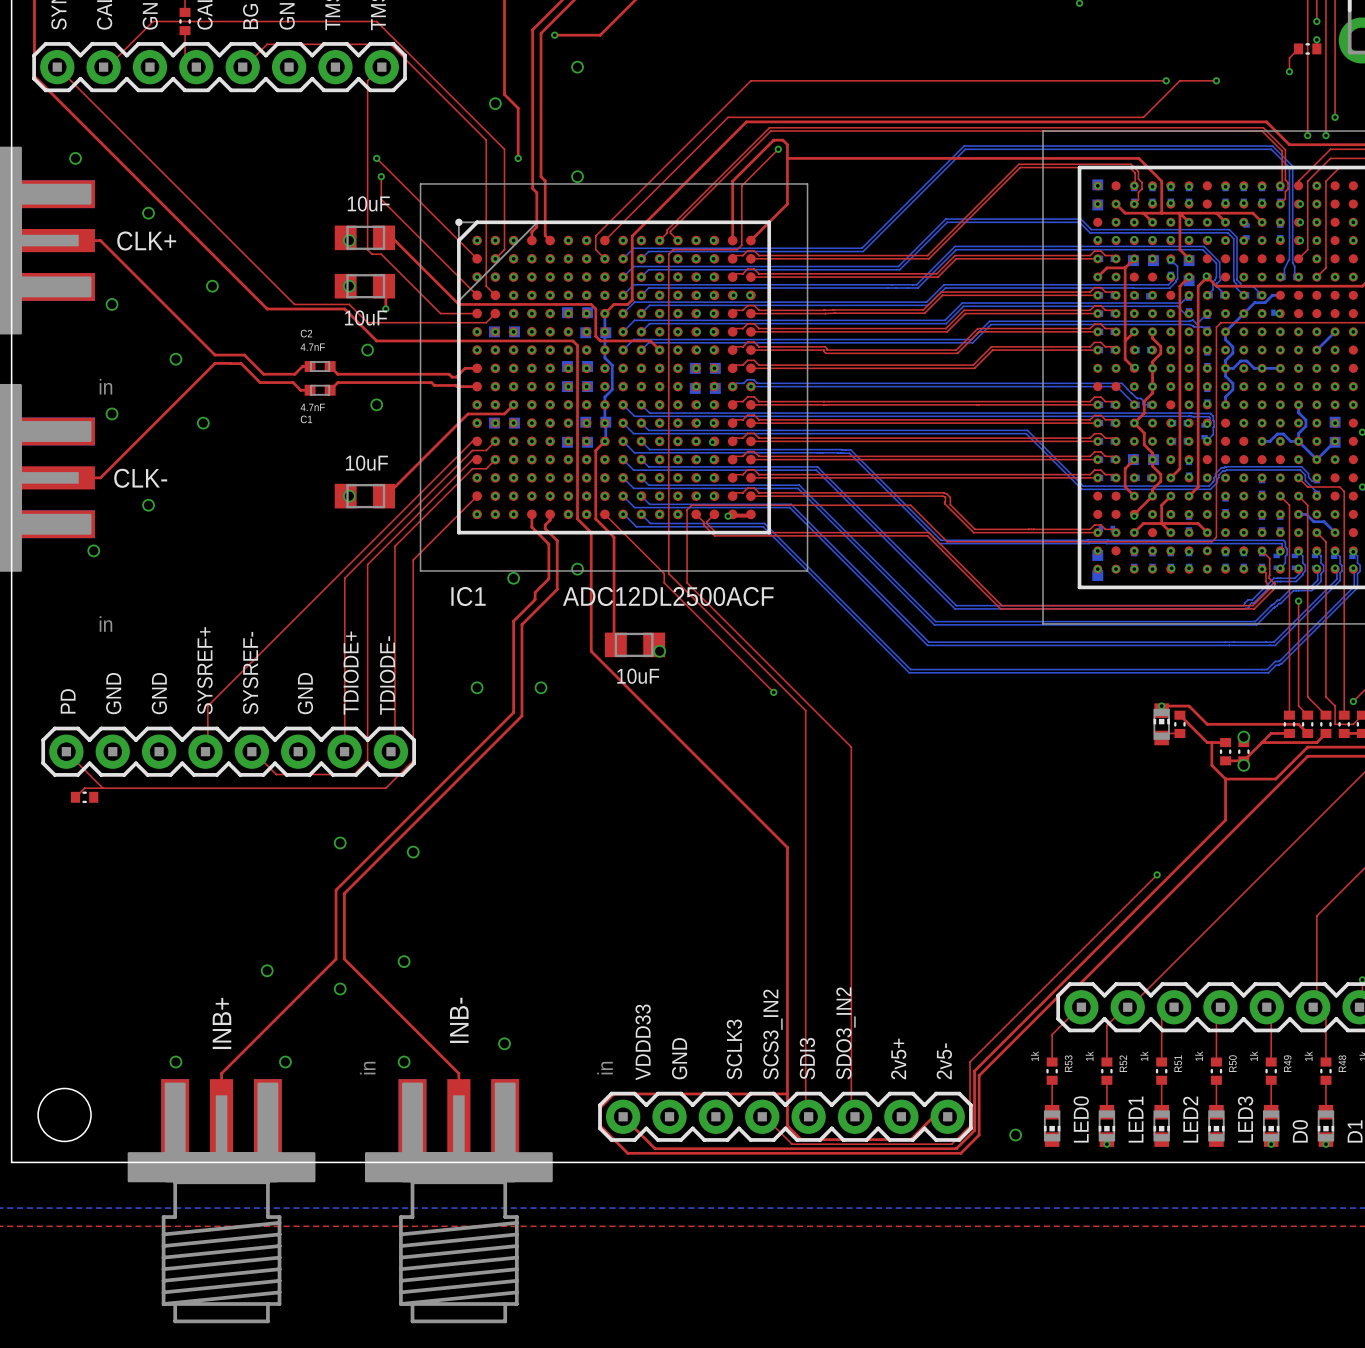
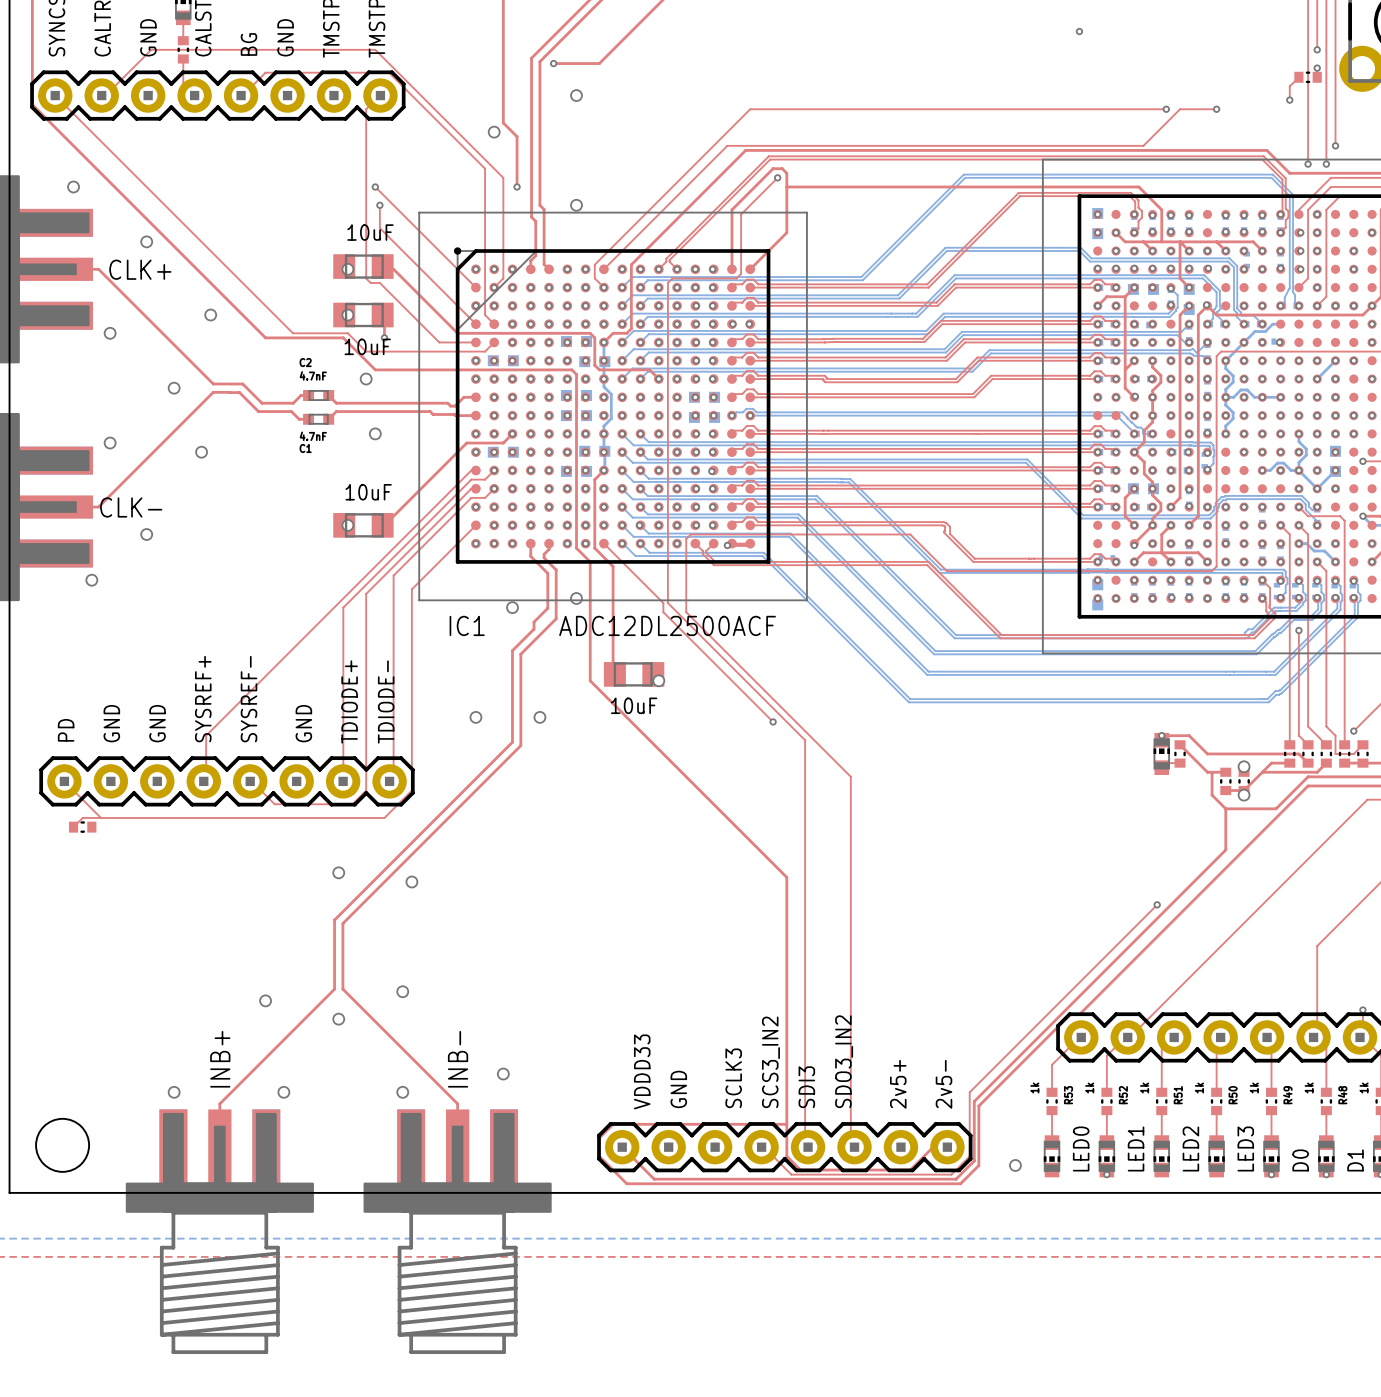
CLK+ value: in (105, 386) -> none
CLK- value: in (105, 623) -> none
INB+ value: in (367, 1068) -> none
INB- value: in (604, 1068) -> none

